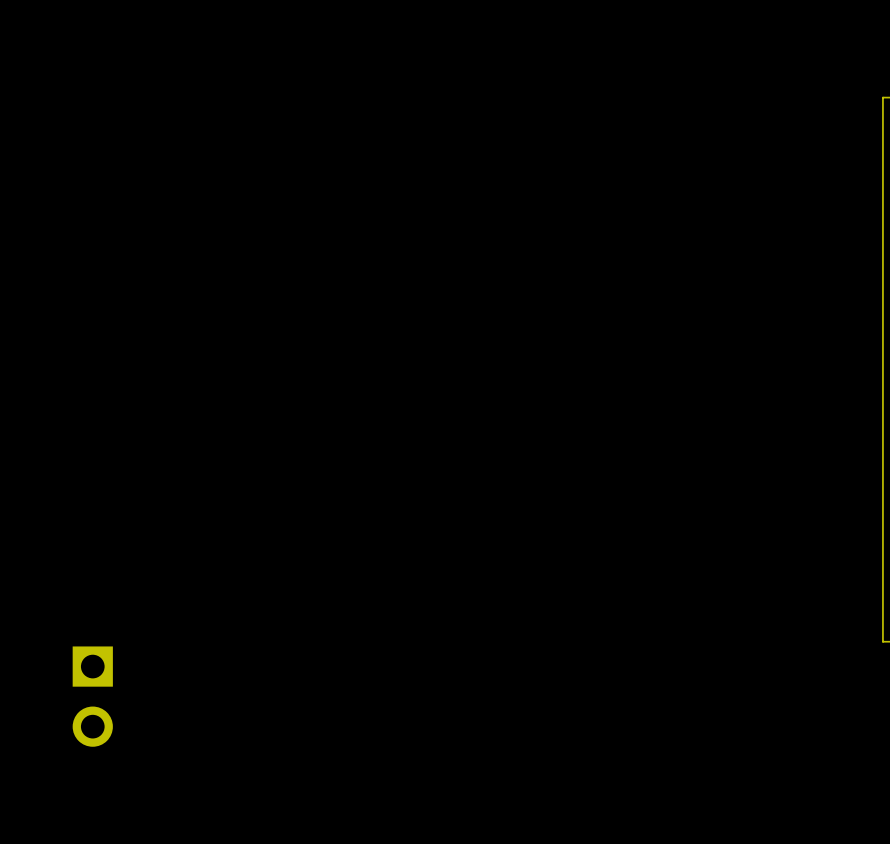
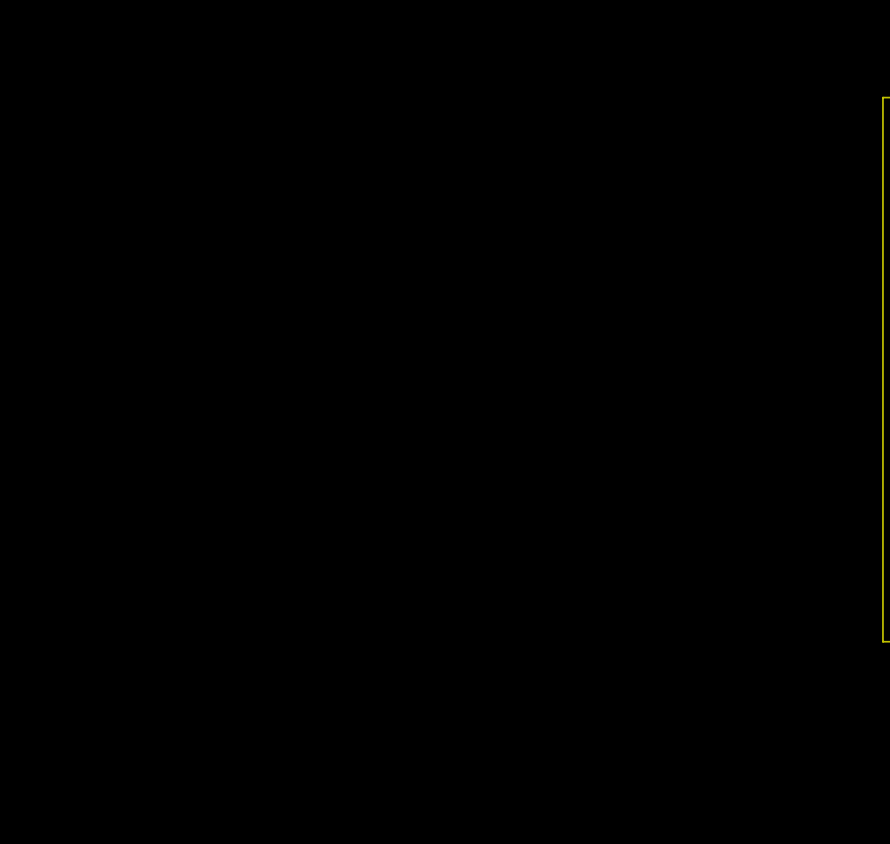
part: (92, 696) -> none

